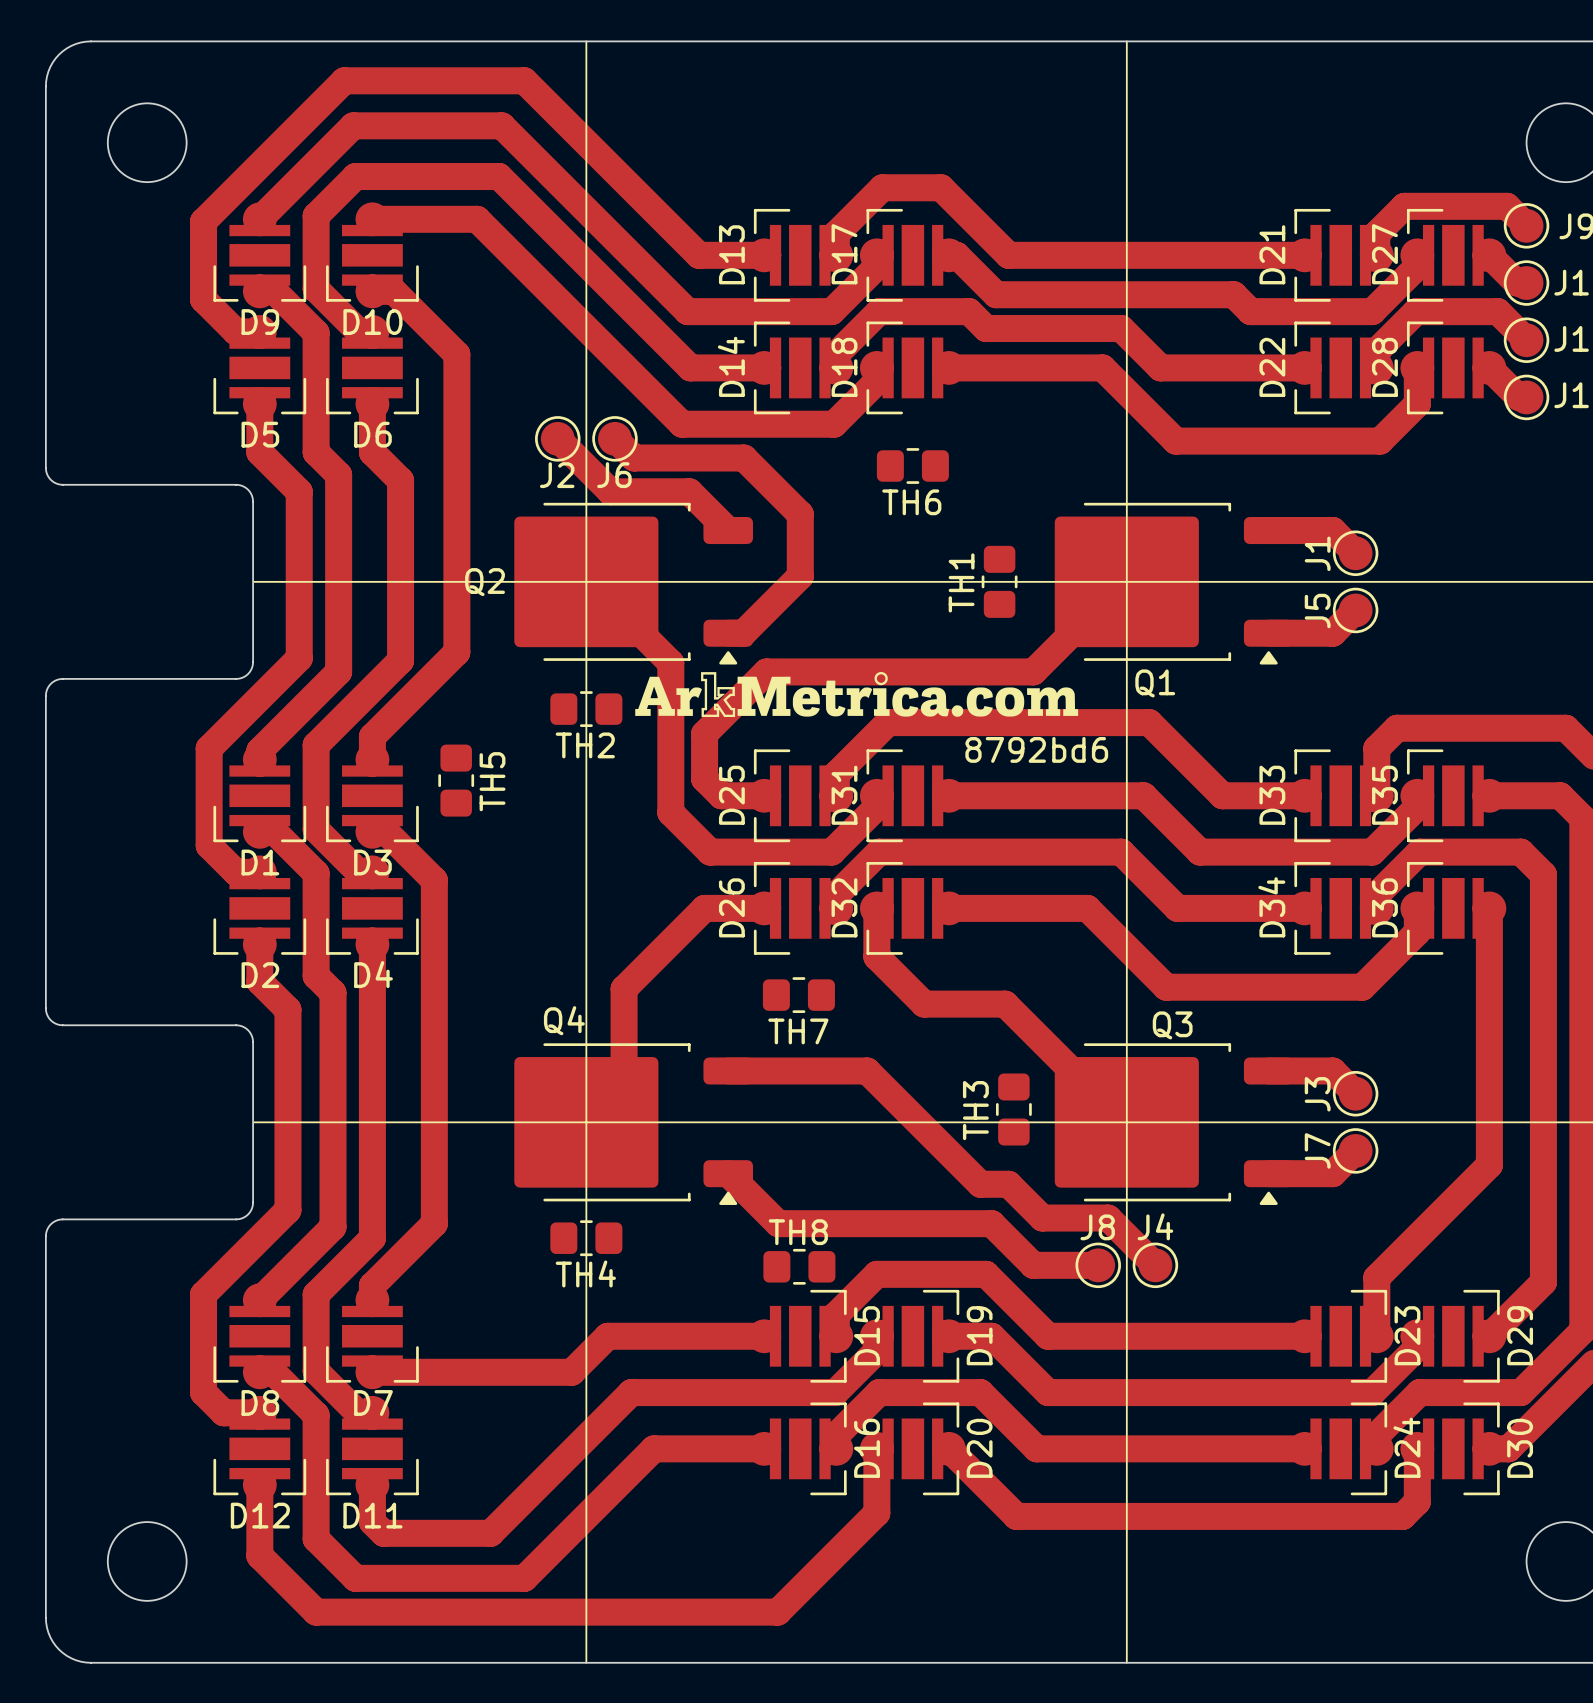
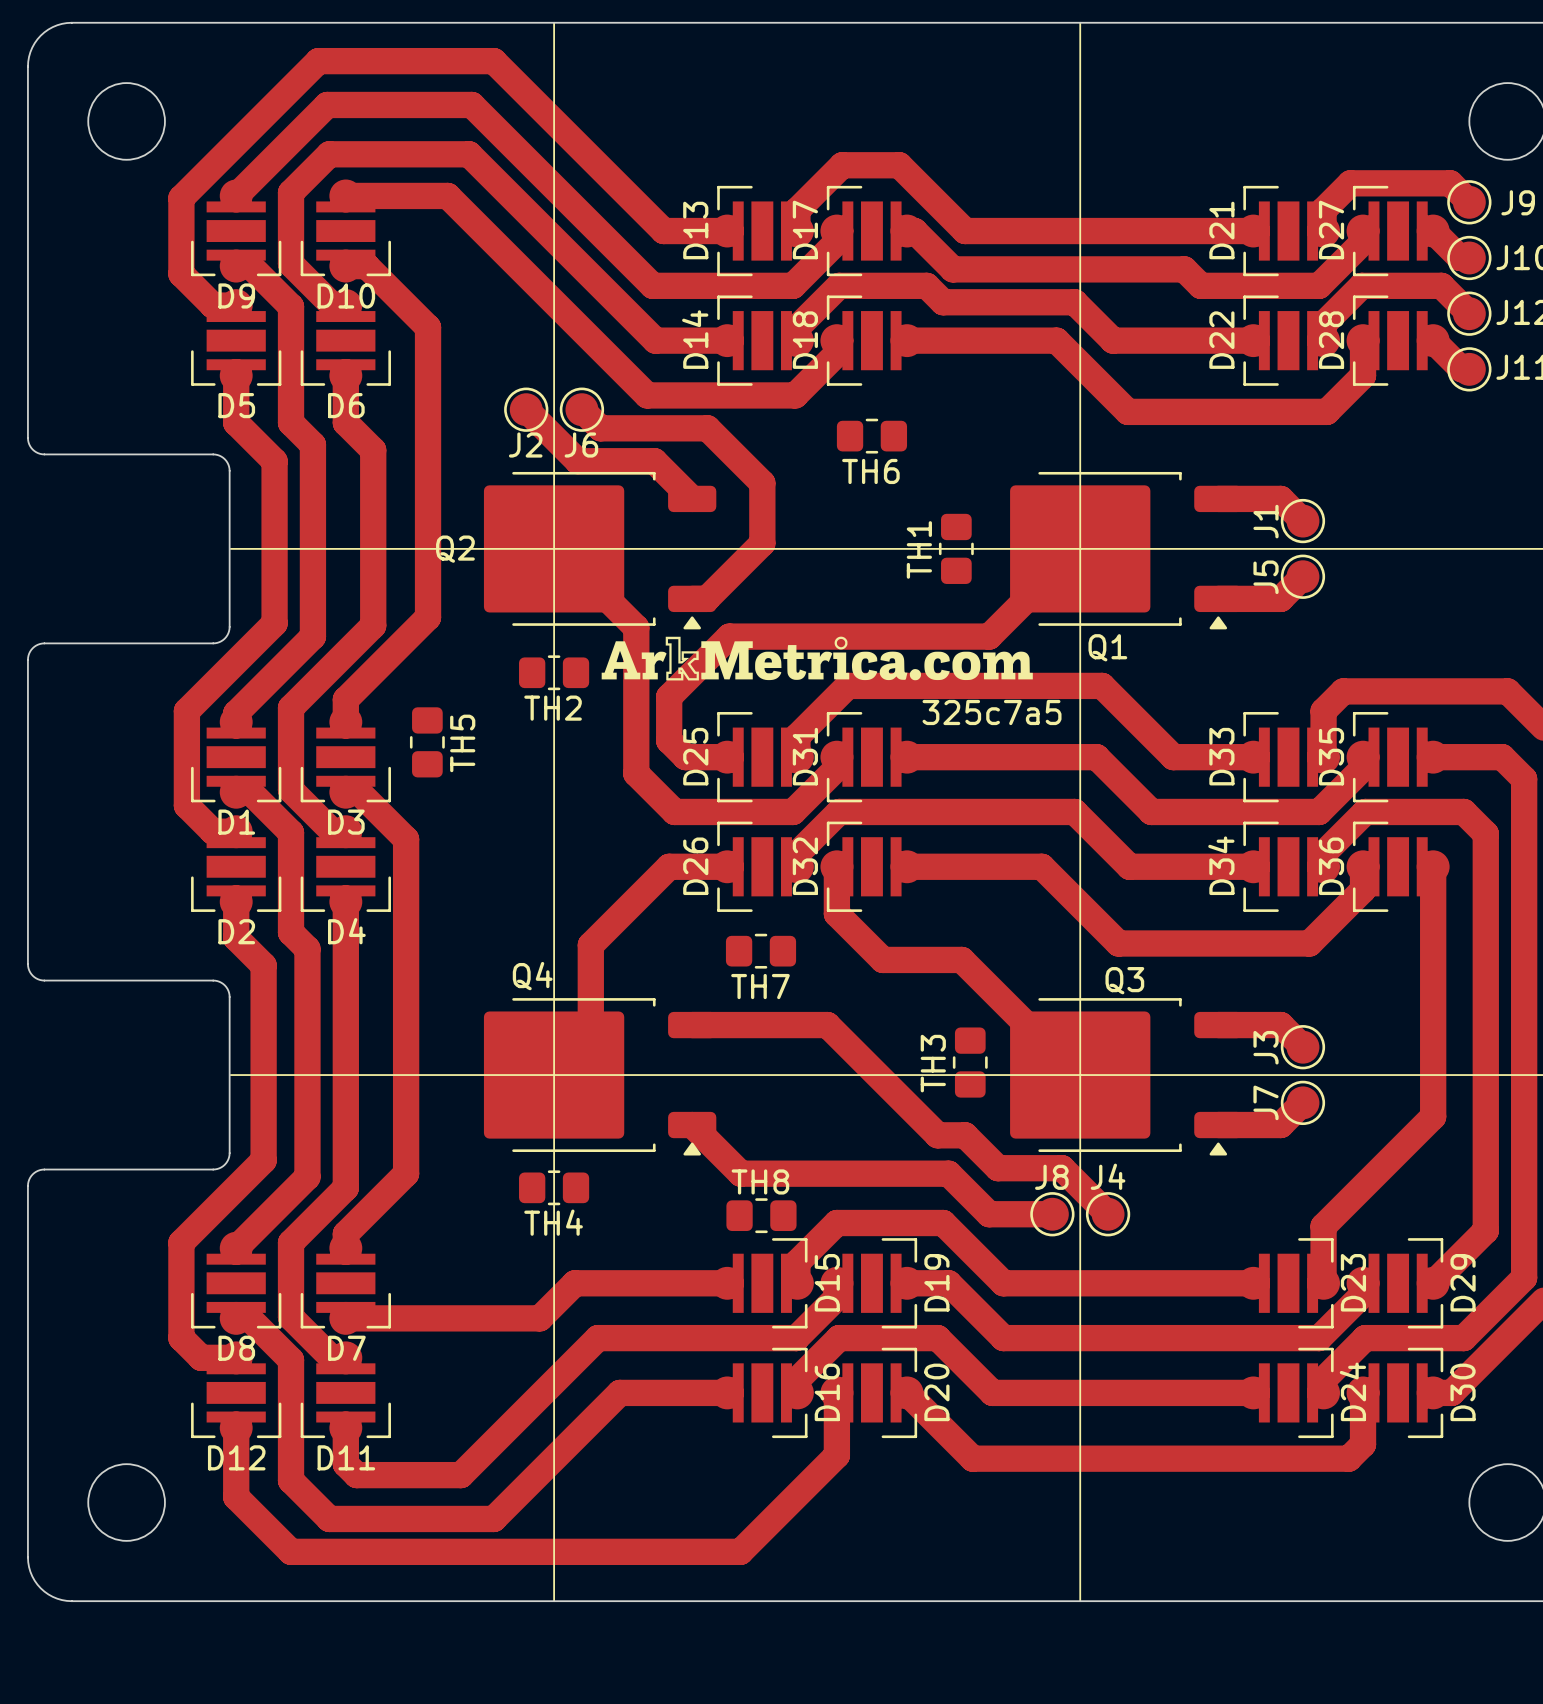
text: 8792bd6 (1036, 749) -> 325c7a5 (992, 712)

